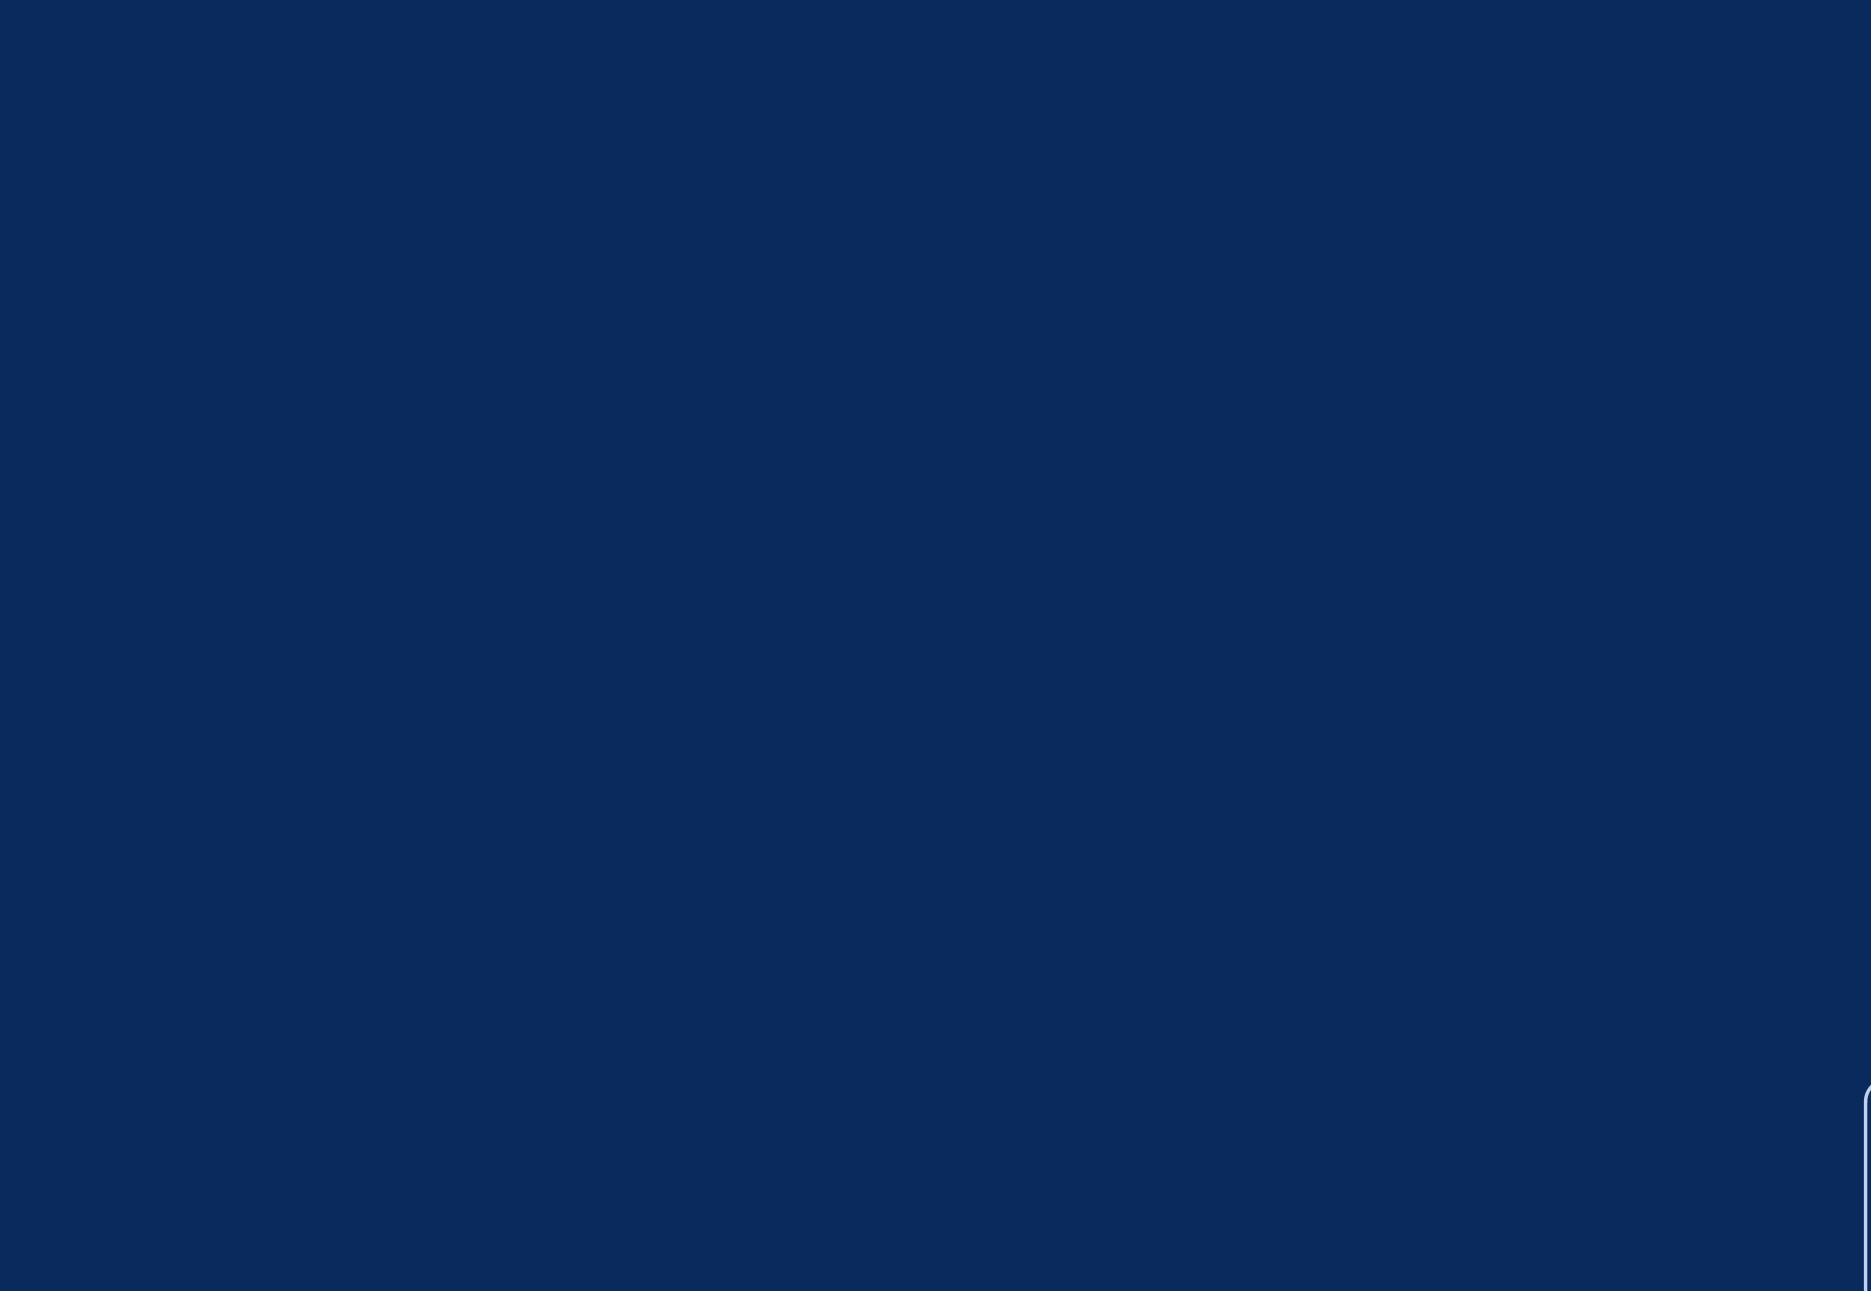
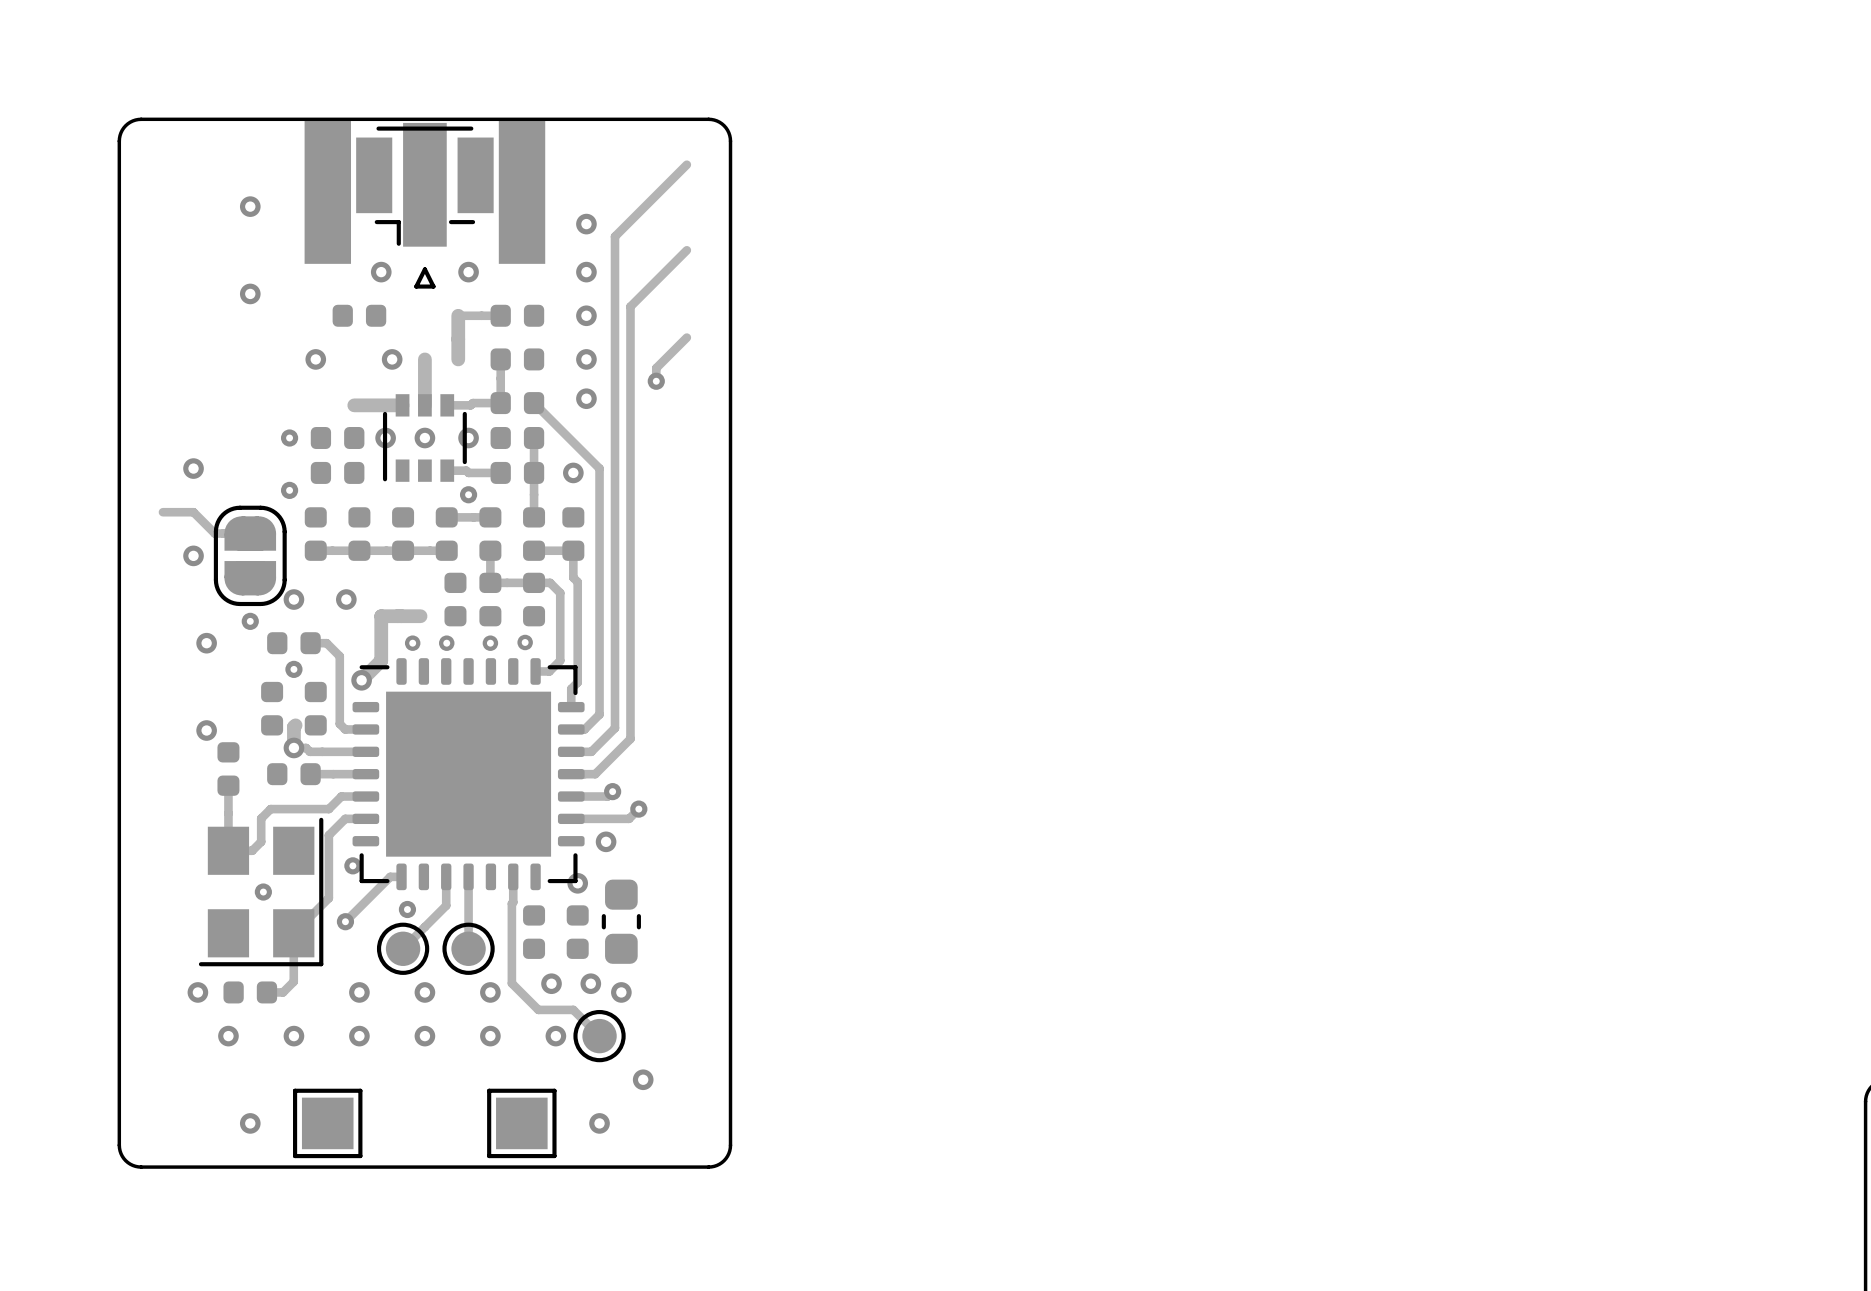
board edge: none -> (141, 119) (708, 119) (719, 122) (727, 130) (730, 141) (730, 1145) (727, 1156) (719, 1164) (708, 1167) (141, 1167) (130, 1164) (122, 1156) (119, 1145) (119, 141) (120, 132) (125, 125) (132, 120) (141, 119)
track: none -> (686, 164) (615, 236) (615, 728) (591, 751) (571, 751)
part: none -> (424, 186)
part: none -> (424, 204)
via: none -> (250, 206)
via: none -> (586, 224)
track: none -> (686, 250) (630, 306) (630, 738) (595, 774) (571, 774)
via: none -> (381, 272)
via: none -> (468, 272)
via: none -> (586, 272)
via: none -> (250, 293)
part: none -> (359, 315)
track: none -> (500, 315) (458, 315) (458, 359)
part: none -> (517, 315)
via: none -> (586, 315)
track: none -> (686, 337) (656, 368) (656, 381)
via: none -> (315, 359)
via: none -> (392, 359)
track: none -> (424, 359) (424, 405)
track: none -> (500, 359) (500, 403) (447, 405)
part: none -> (517, 359)
via: none -> (586, 359)
via: none -> (656, 381)
via: none -> (586, 398)
part: none -> (517, 403)
track: none -> (534, 403) (599, 468) (599, 714) (584, 729) (571, 729)
track: none -> (354, 405) (402, 405)
via: none -> (289, 438)
part: none -> (337, 438)
via: none -> (385, 438)
part: none -> (424, 438)
via: none -> (424, 438)
via: none -> (468, 438)
part: none -> (517, 438)
track: none -> (534, 438) (534, 517)
via: none -> (193, 468)
track: none -> (447, 470) (500, 472)
part: none -> (337, 472)
part: none -> (517, 472)
via: none -> (573, 472)
via: none -> (289, 490)
via: none -> (468, 494)
track: none -> (162, 512) (193, 512) (214, 533) (250, 533)
track: none -> (446, 517) (490, 517)
part: none -> (315, 534)
part: none -> (359, 534)
part: none -> (403, 534)
part: none -> (446, 534)
part: none -> (490, 534)
part: none -> (534, 534)
part: none -> (573, 534)
track: none -> (315, 550) (446, 550)
track: none -> (534, 550) (573, 550) (573, 577) (577, 582) (577, 682) (571, 688) (571, 707)
via: none -> (193, 555)
part: none -> (250, 555)
track: none -> (490, 555) (490, 582) (550, 582) (560, 592) (560, 660) (549, 671) (535, 671)
via: none -> (293, 599)
via: none -> (346, 599)
part: none -> (455, 599)
part: none -> (490, 599)
part: none -> (534, 599)
track: none -> (420, 616) (381, 616) (381, 660) (361, 680)
via: none -> (250, 621)
via: none -> (525, 642)
via: none -> (206, 643)
part: none -> (293, 643)
track: none -> (310, 643) (326, 643) (339, 656) (339, 723) (345, 729) (365, 729)
via: none -> (412, 643)
via: none -> (446, 643)
via: none -> (490, 643)
via: none -> (293, 669)
via: none -> (361, 680)
part: none -> (272, 708)
part: none -> (315, 708)
track: none -> (295, 725) (293, 727) (293, 747) (306, 747) (309, 751) (365, 751)
via: none -> (206, 730)
via: none -> (293, 747)
part: none -> (228, 769)
part: none -> (293, 774)
track: none -> (310, 774) (365, 774)
part: none -> (468, 774)
track: none -> (228, 785) (228, 850) (252, 850) (261, 841) (261, 818) (270, 809) (328, 809) (341, 796) (365, 796)
track: none -> (612, 791) (607, 796) (571, 796)
via: none -> (612, 791)
track: none -> (638, 809) (629, 818) (571, 818)
via: none -> (638, 809)
track: none -> (365, 818) (345, 818) (328, 835) (328, 898) (293, 933) (293, 981) (283, 992) (266, 992)
via: none -> (606, 841)
via: none -> (352, 865)
track: none -> (401, 876) (390, 876) (345, 921)
track: none -> (446, 876) (446, 905) (403, 948)
track: none -> (468, 876) (468, 948)
track: none -> (513, 876) (511, 983) (538, 1009) (573, 1009) (599, 1036)
via: none -> (577, 883)
part: none -> (261, 892)
via: none -> (263, 892)
via: none -> (407, 909)
via: none -> (345, 921)
part: none -> (621, 921)
part: none -> (534, 932)
part: none -> (577, 932)
part: none -> (403, 948)
part: none -> (468, 948)
via: none -> (551, 983)
via: none -> (590, 983)
via: none -> (197, 992)
part: none -> (250, 992)
via: none -> (359, 992)
via: none -> (424, 992)
via: none -> (490, 992)
via: none -> (621, 992)
via: none -> (228, 1036)
via: none -> (293, 1036)
via: none -> (359, 1036)
via: none -> (424, 1036)
via: none -> (490, 1036)
via: none -> (555, 1036)
part: none -> (599, 1036)
via: none -> (643, 1079)
via: none -> (250, 1123)
part: none -> (327, 1123)
part: none -> (521, 1123)
via: none -> (599, 1123)

